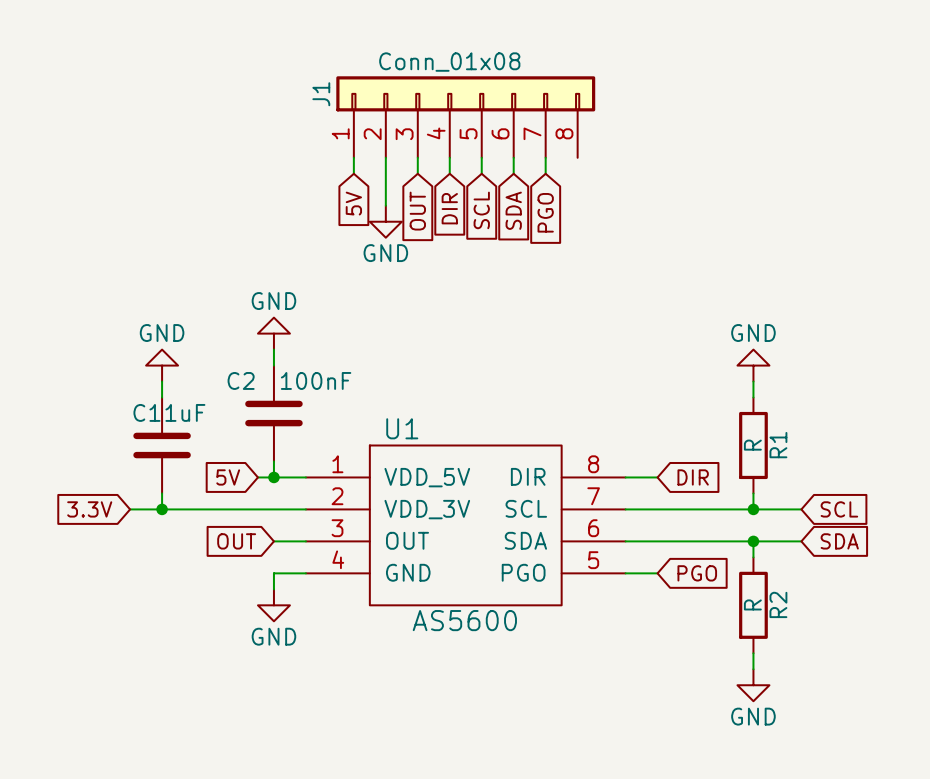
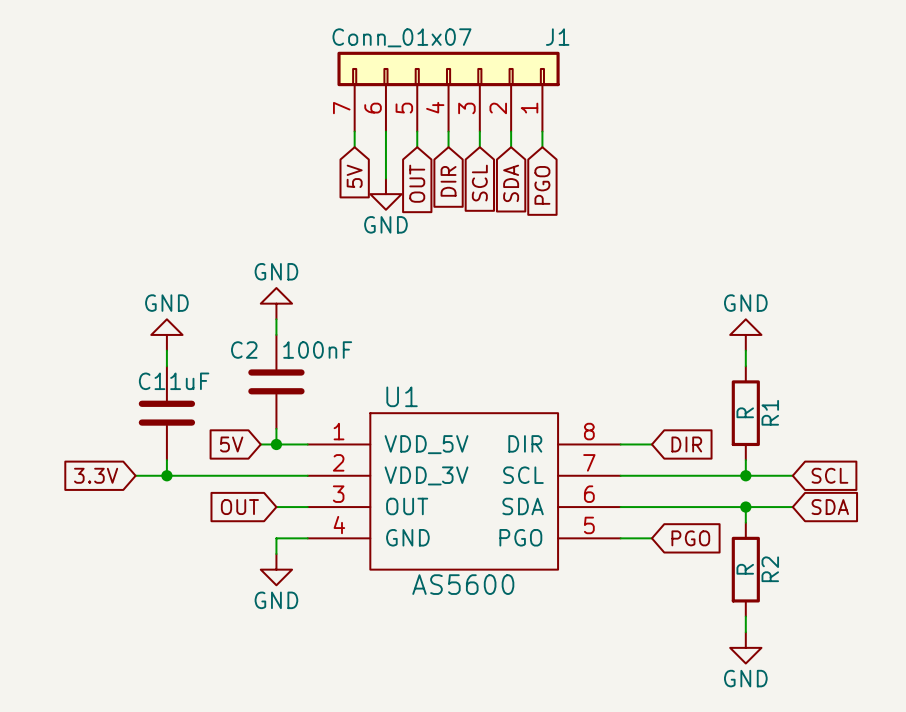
J1 value: Conn_01x08 (449, 62) -> Conn_01x07 (401, 37)
J1 symbol: [336, 76, 596, 158] -> [337, 51, 560, 132]
J1 name position: J1 (321, 94) -> J1 (557, 37)

